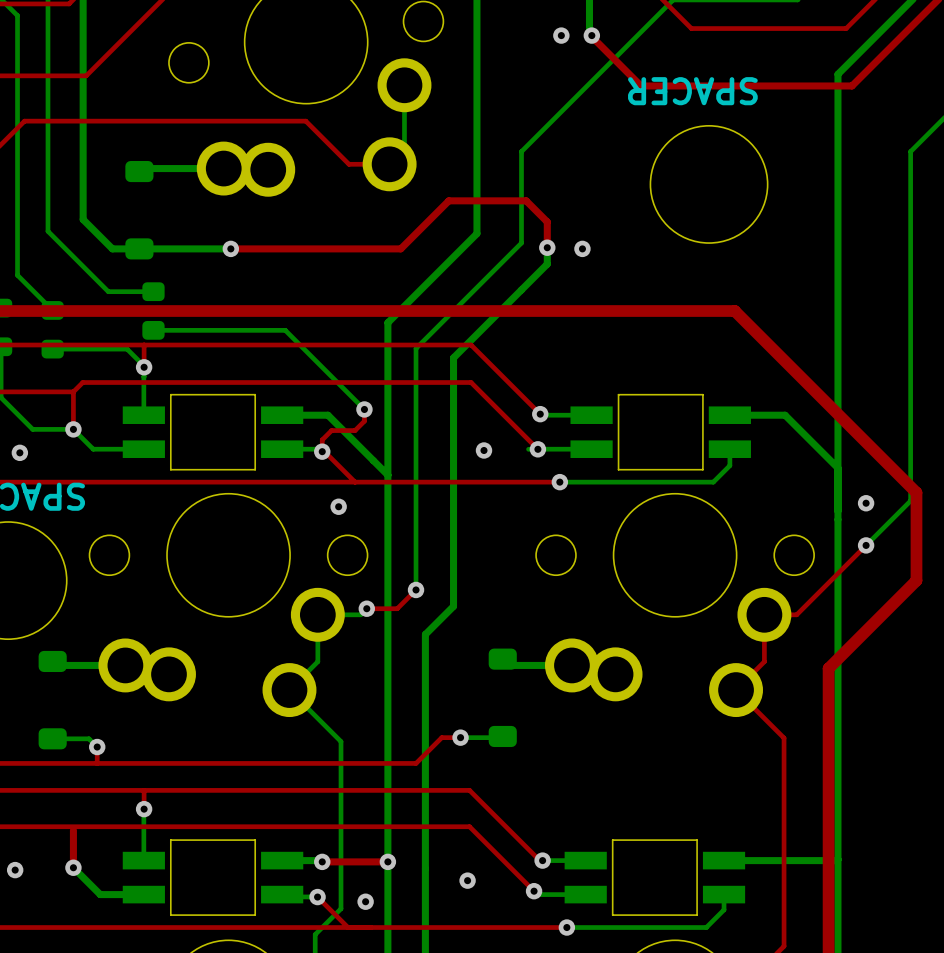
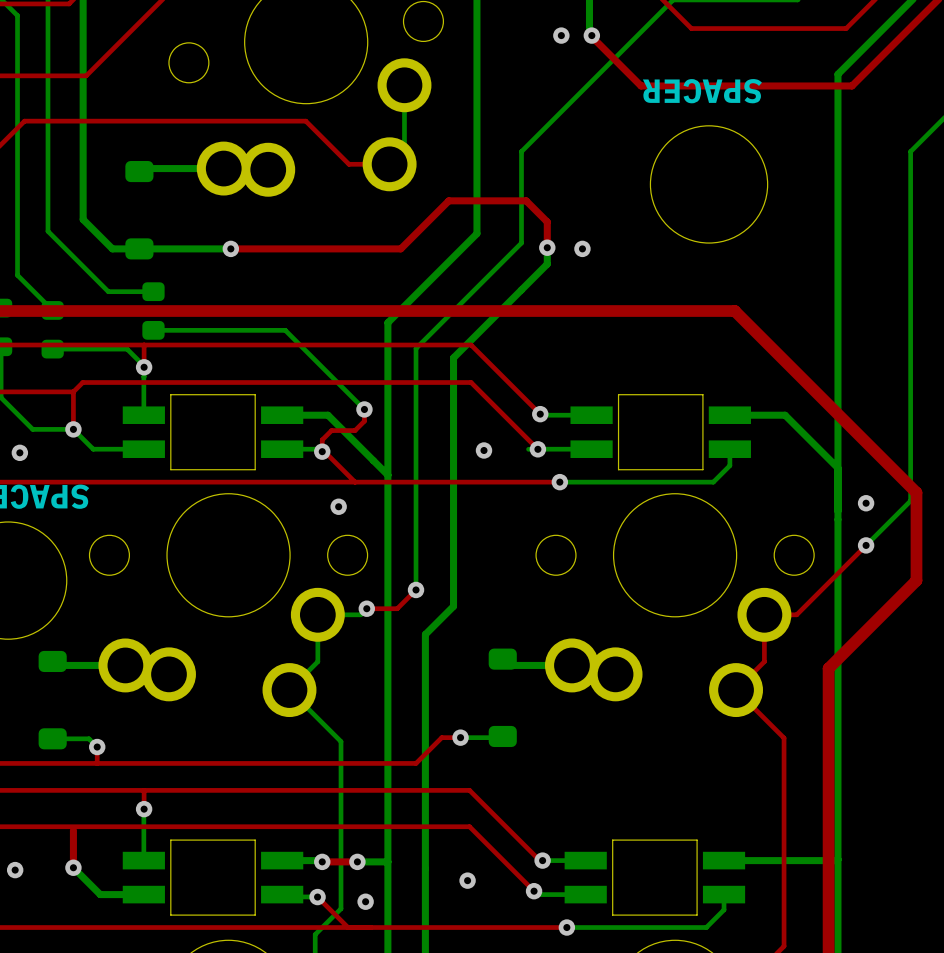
bottom track: none -> (357, 861) (387, 861)
top track: (357, 861) (387, 861) -> none
via position: (387, 861) -> (357, 861)

